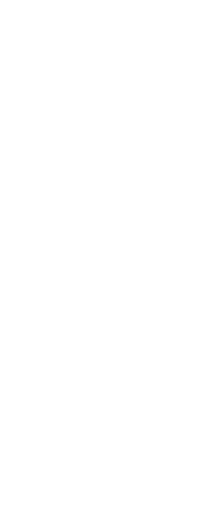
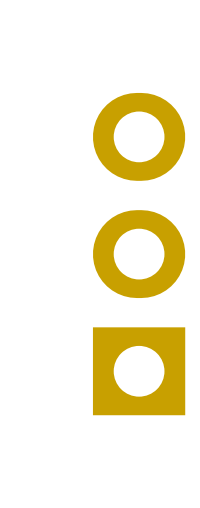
part: none -> (139, 254)

